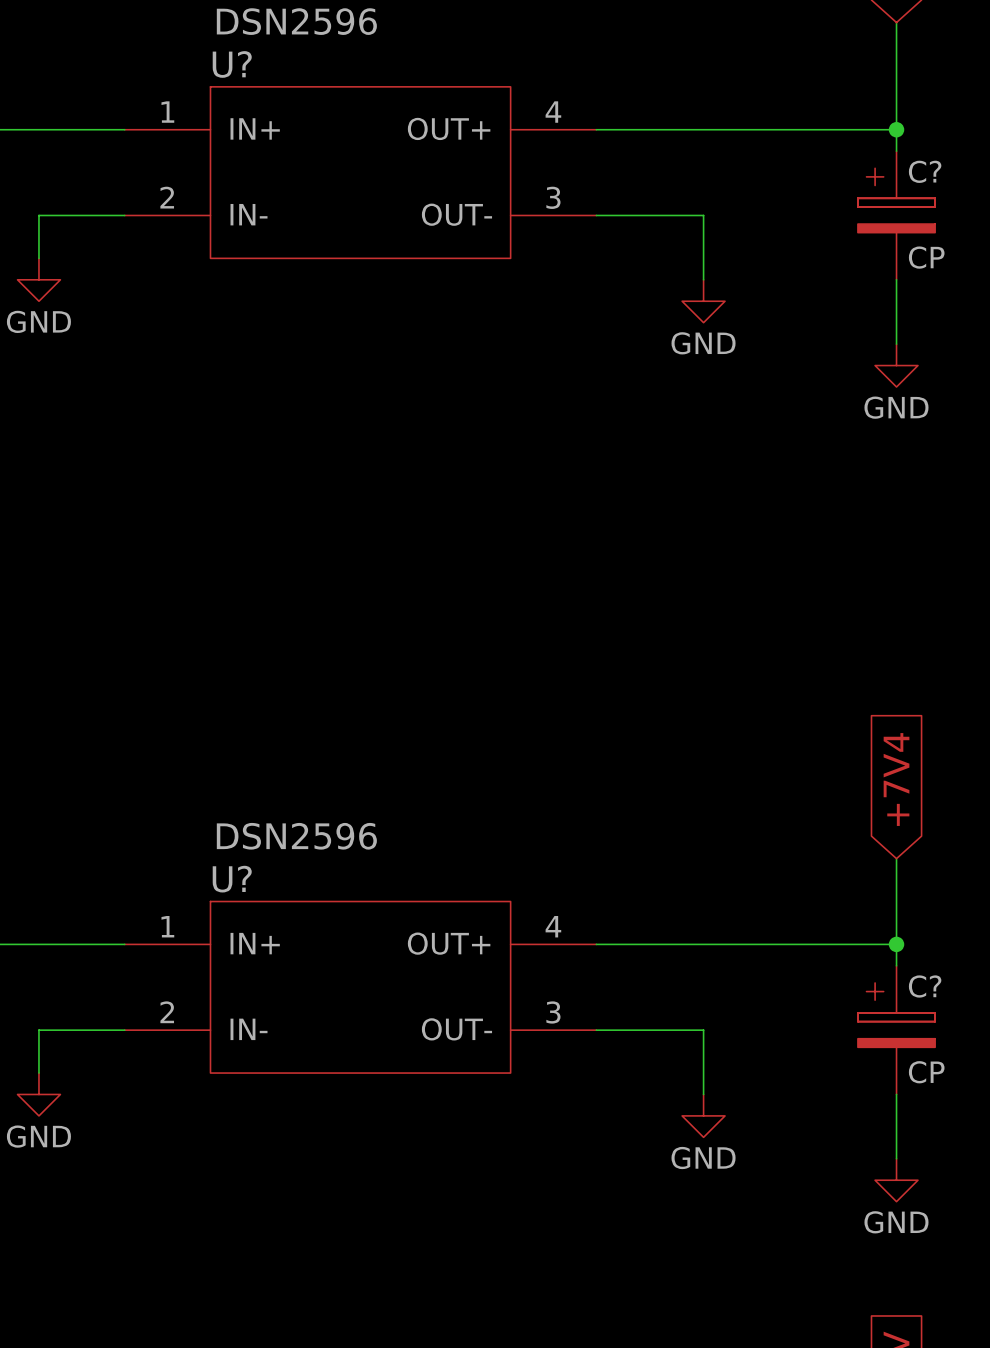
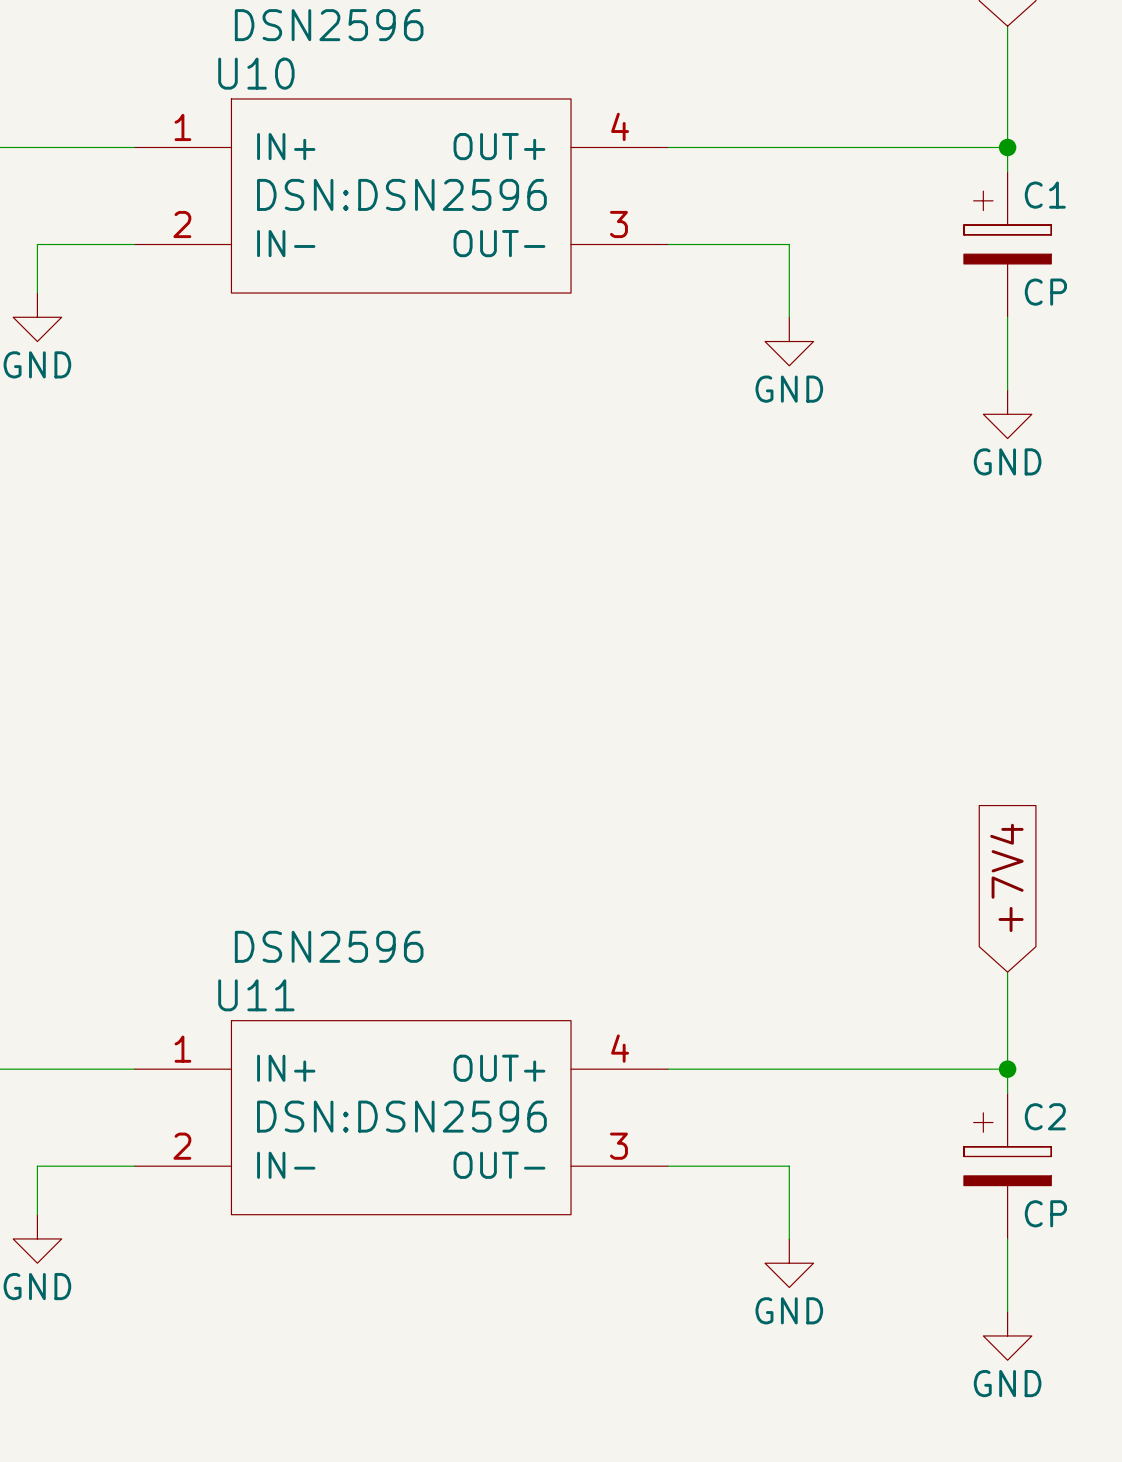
U? name: U? (232, 64) -> U10 (256, 73)
U? text: none -> DSN:DSN2596 (401, 194)
C? name: C? (925, 171) -> C1 (1045, 195)
U? name: U? (232, 879) -> U11 (256, 995)
U? text: none -> DSN:DSN2596 (401, 1116)
C? name: C? (925, 986) -> C2 (1045, 1116)

